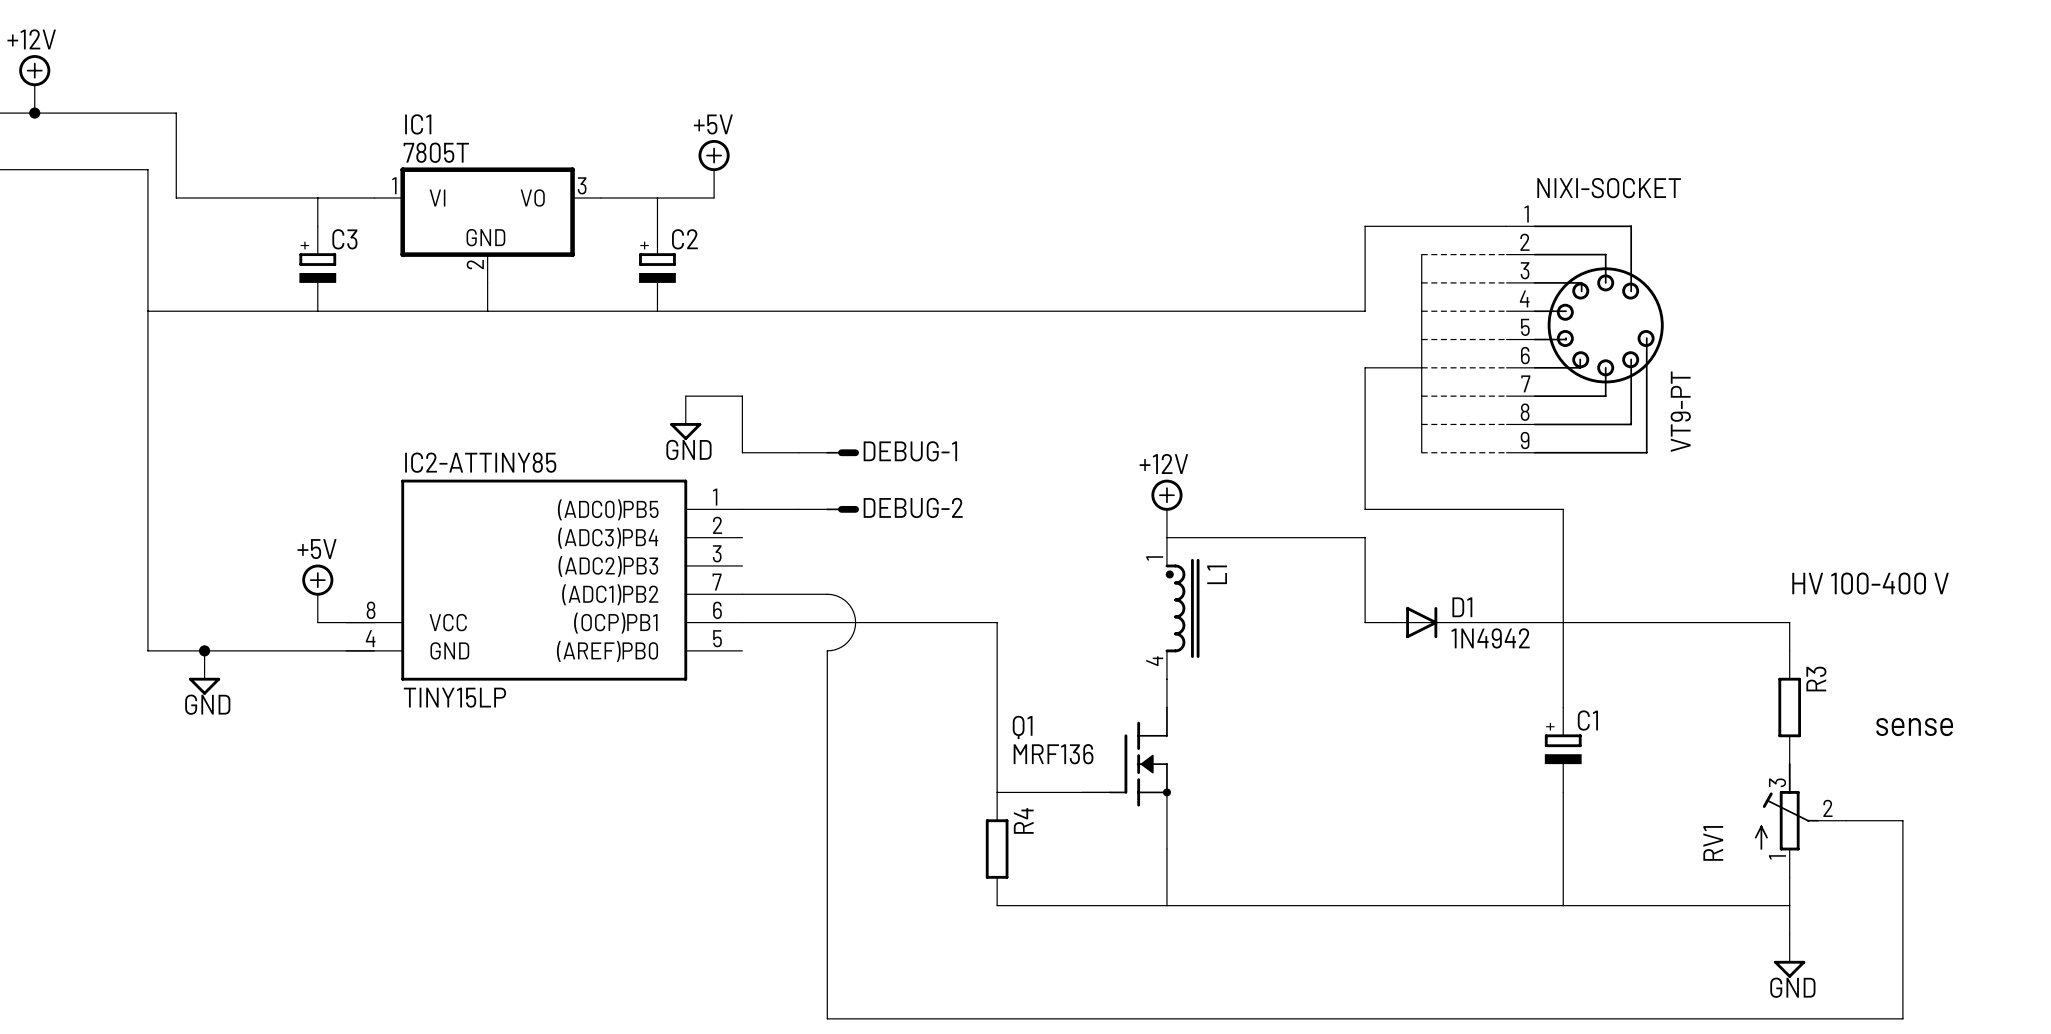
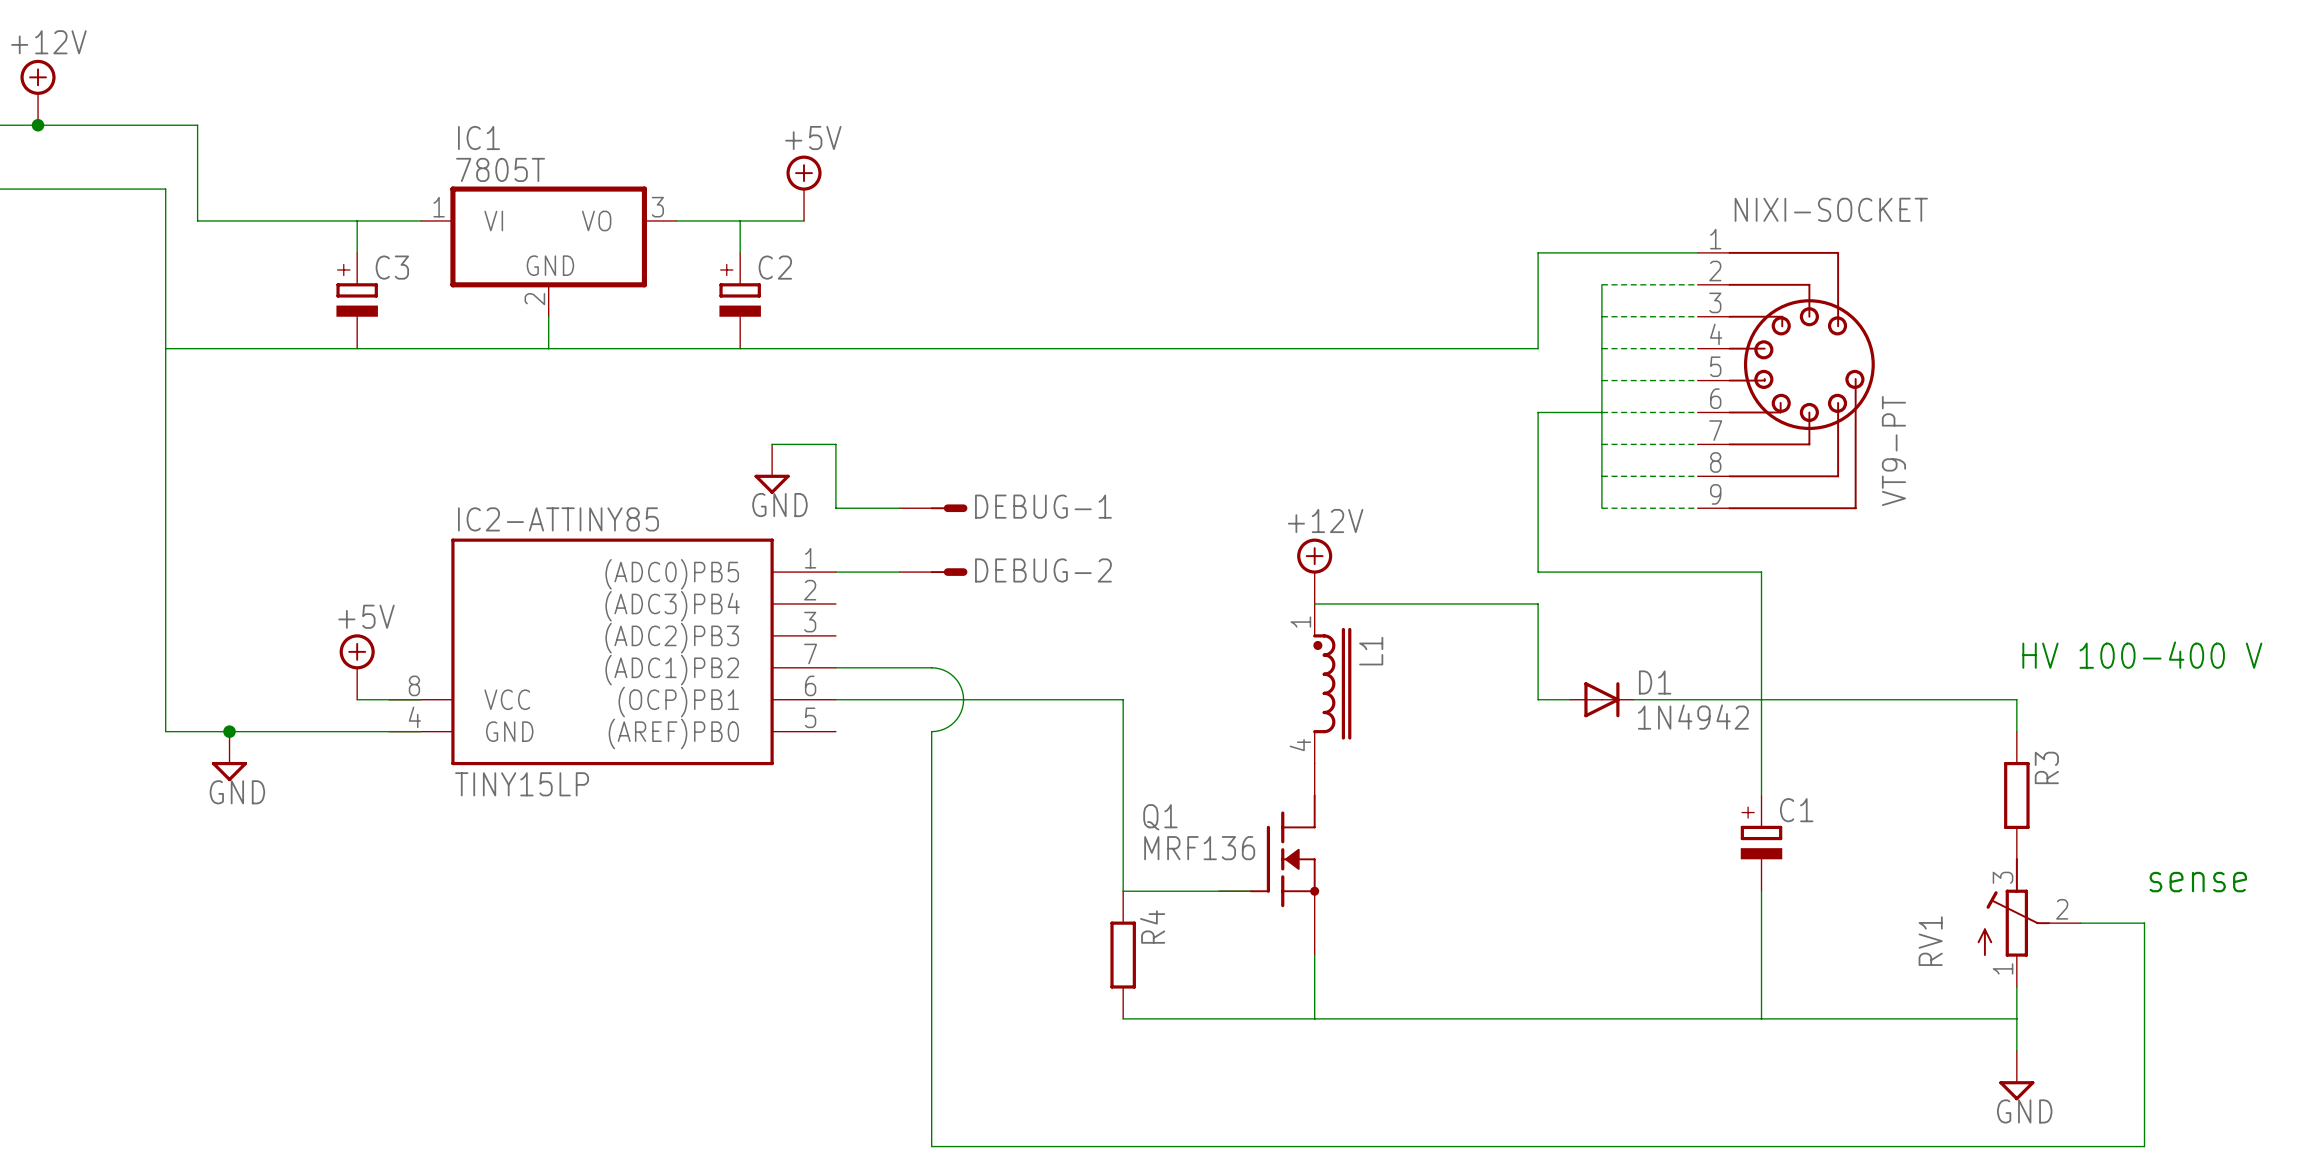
text position: sense (1914, 727) -> sense (2198, 882)

